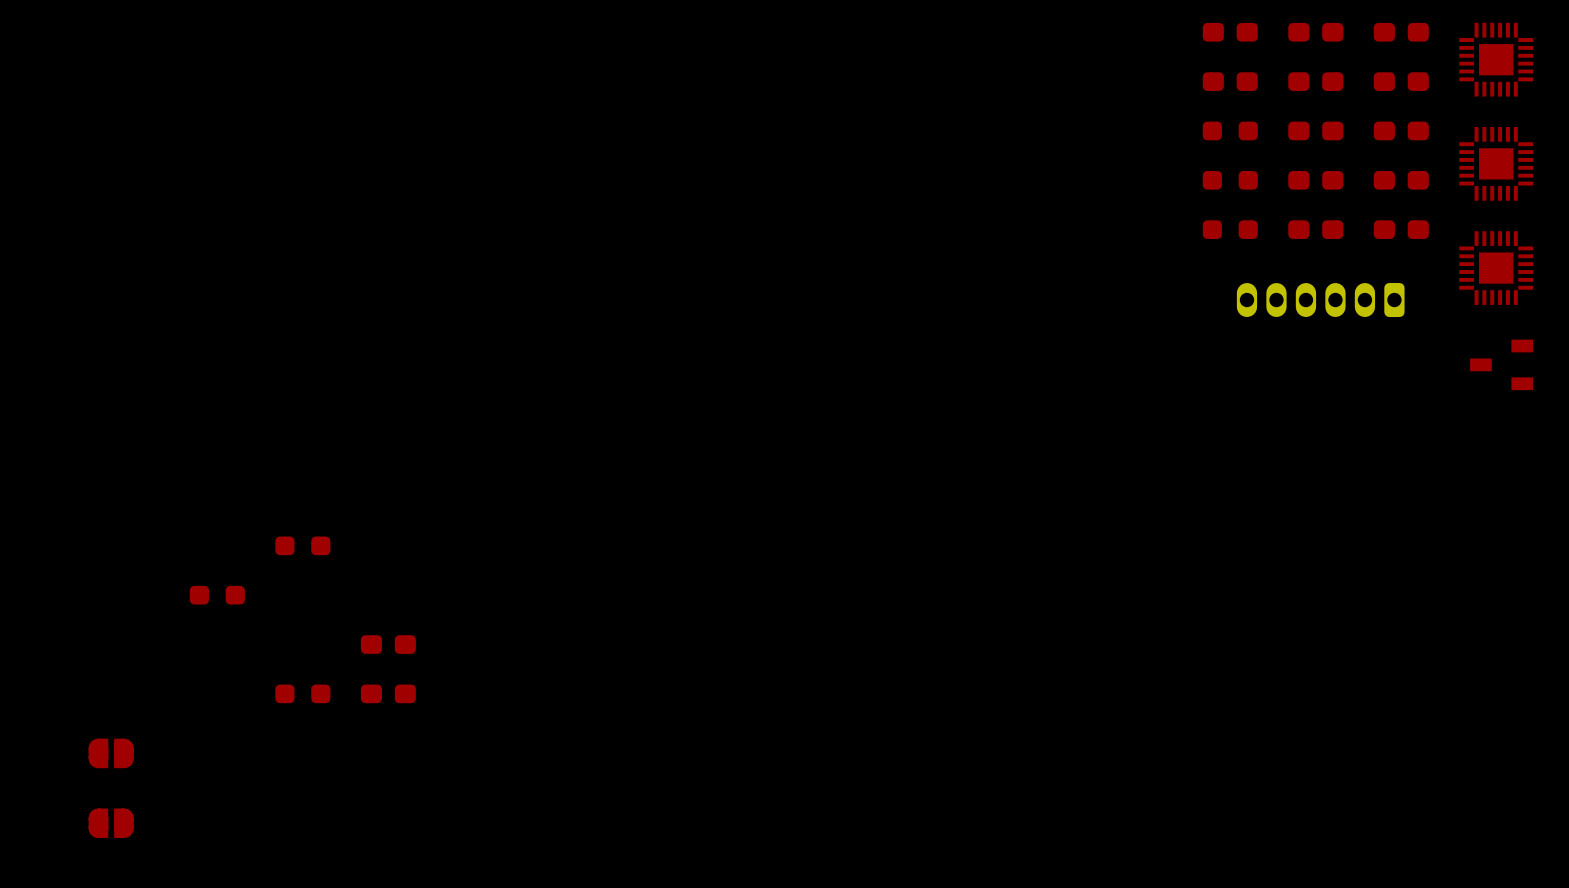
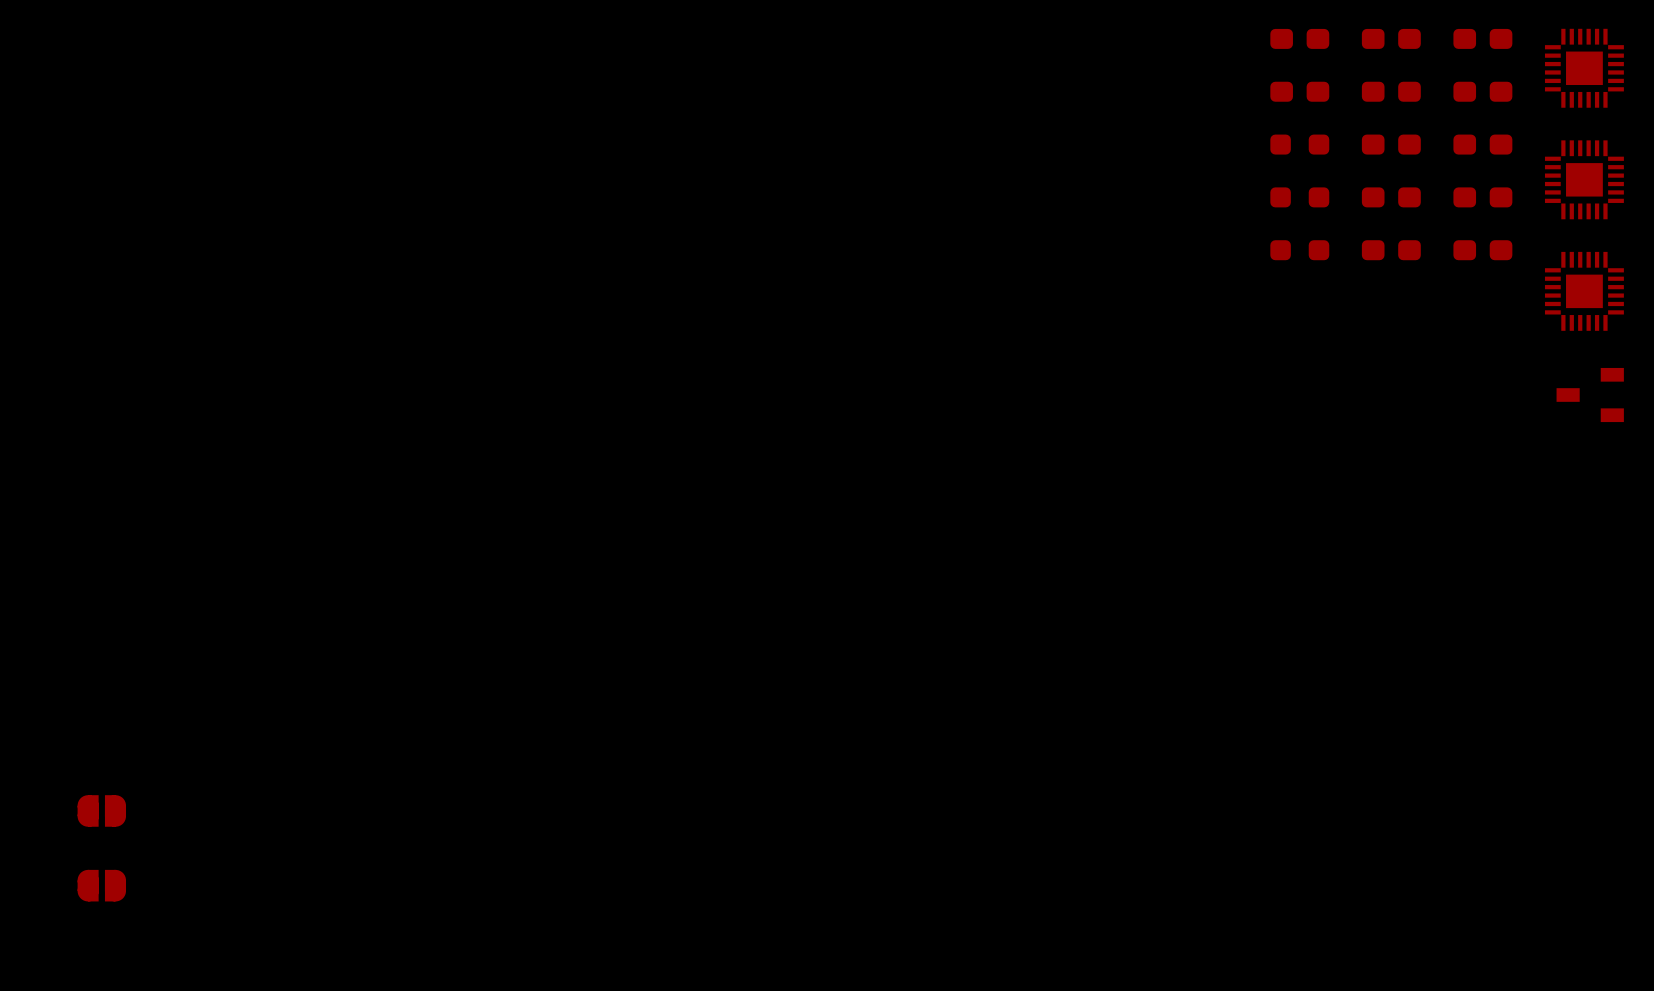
part: (1320, 300) -> none
part: (302, 545) -> none
part: (217, 595) -> none
part: (388, 644) -> none
part: (302, 693) -> none
part: (388, 693) -> none

